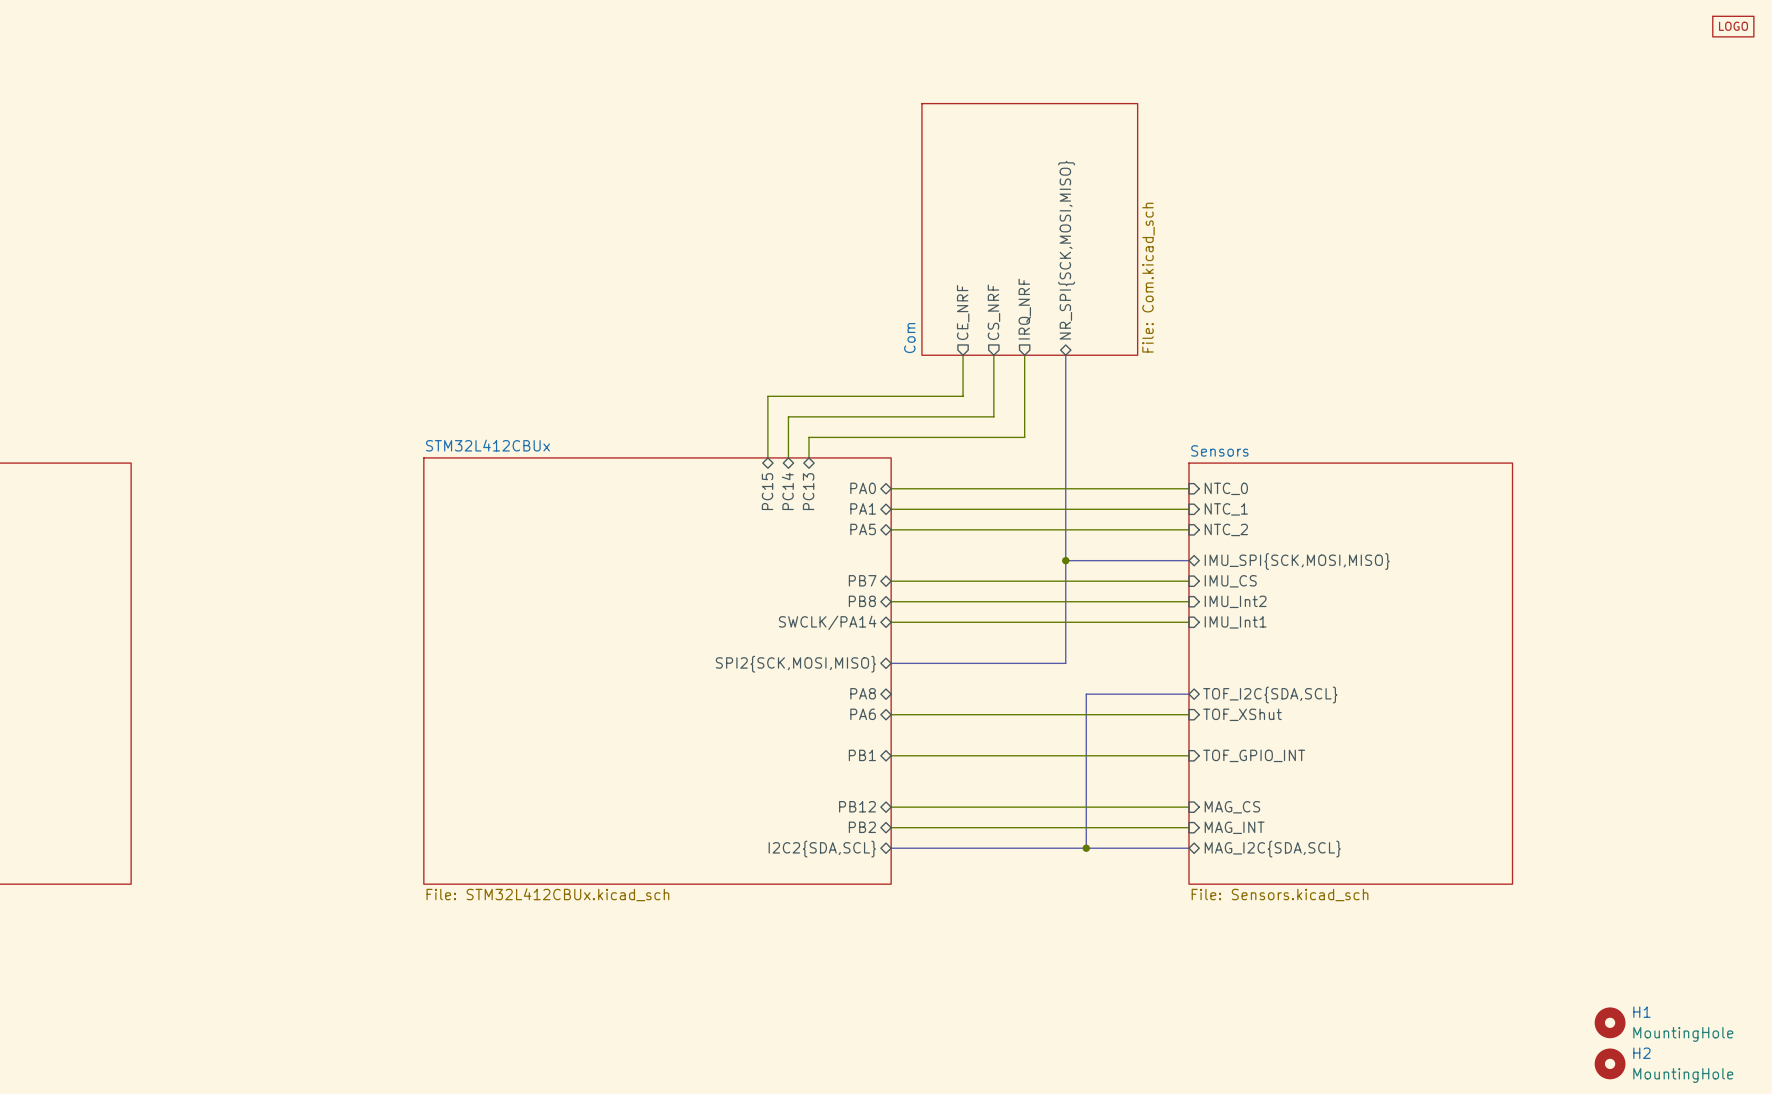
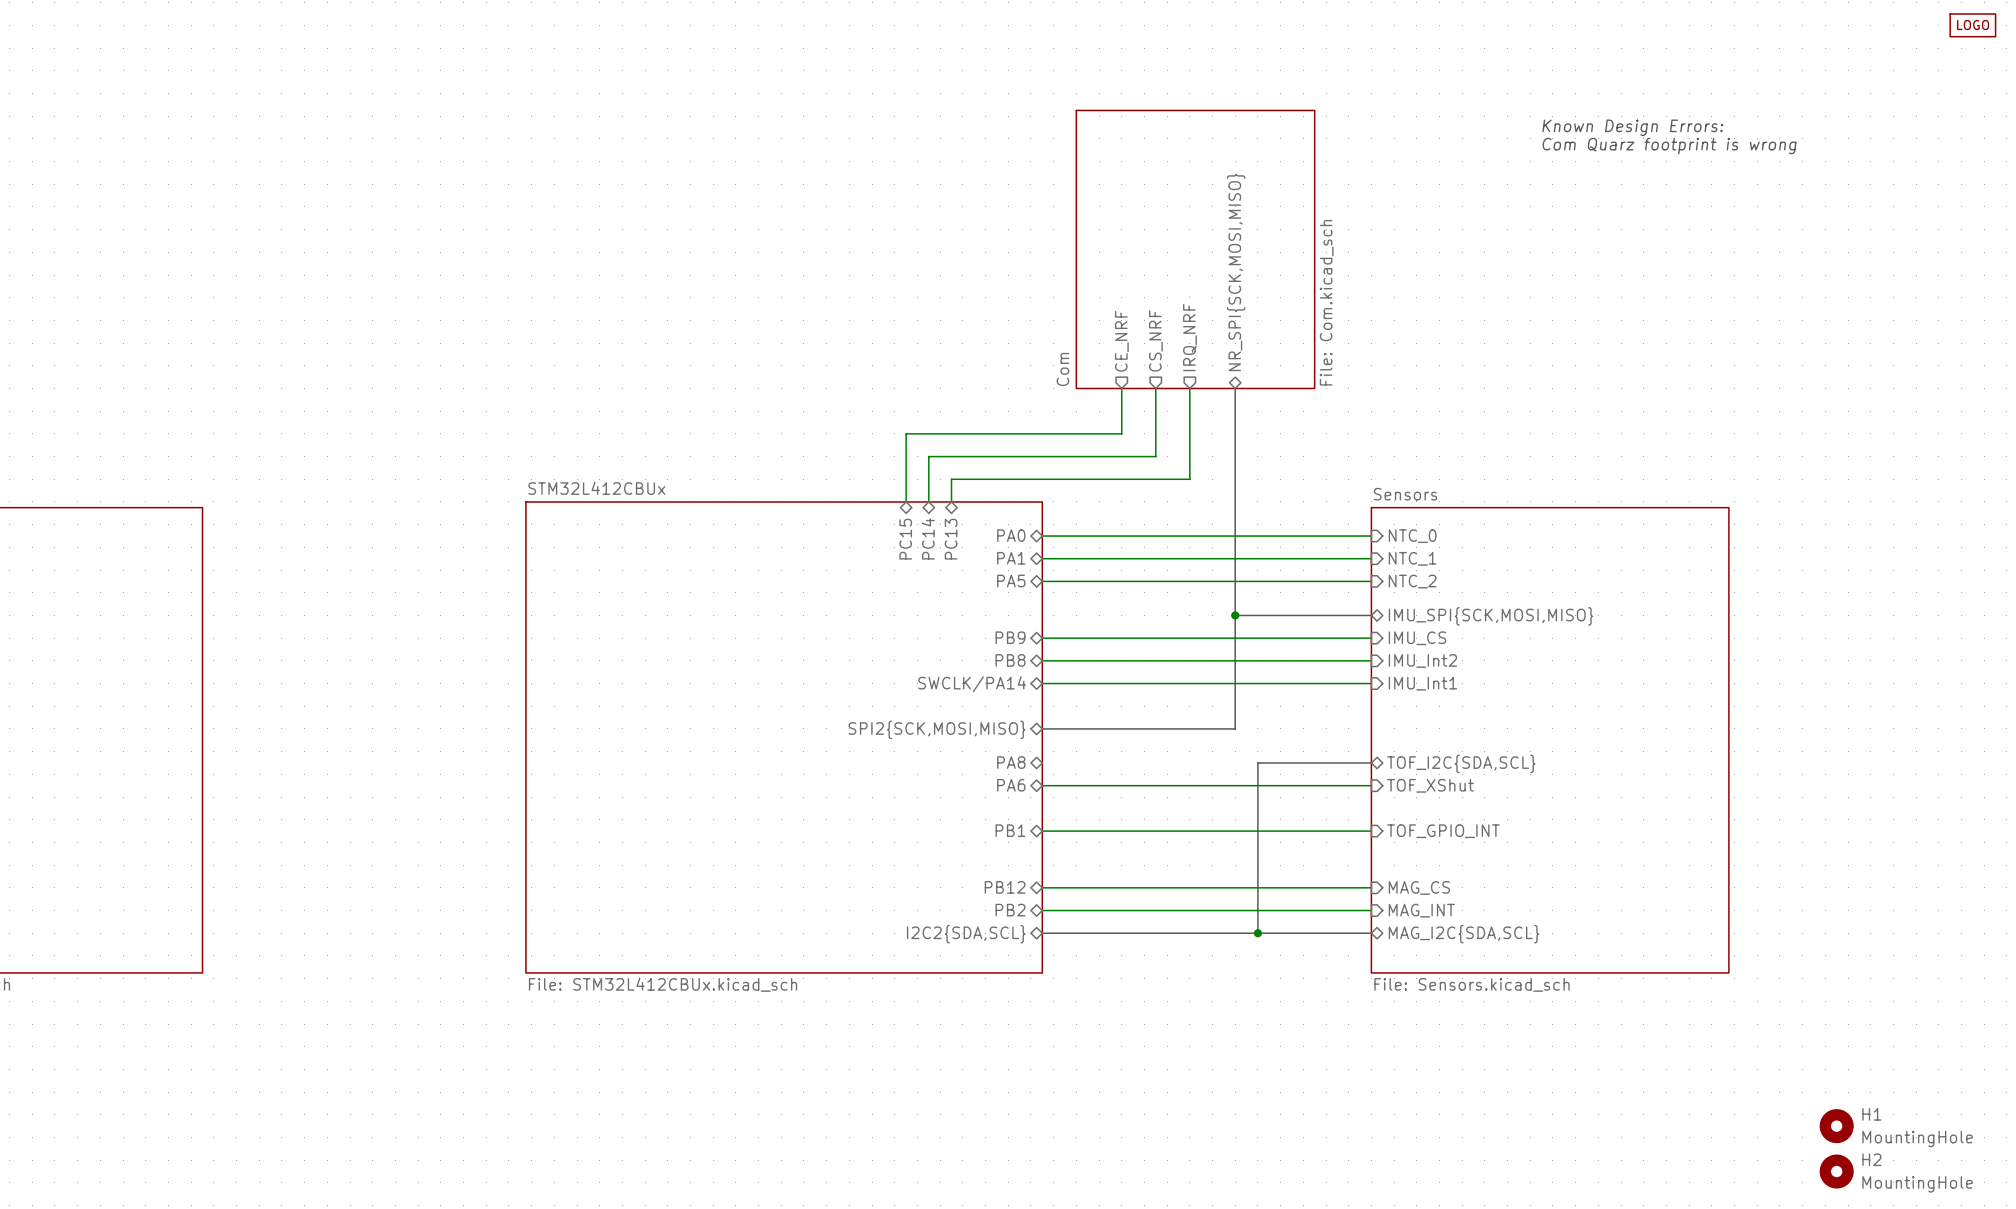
text: none -> Known Design Errors: (1632, 127)
text: none -> Com Quarz footprint is wrong (1669, 146)
sheet pin: PB7 (862, 580) -> PB9 (1010, 637)

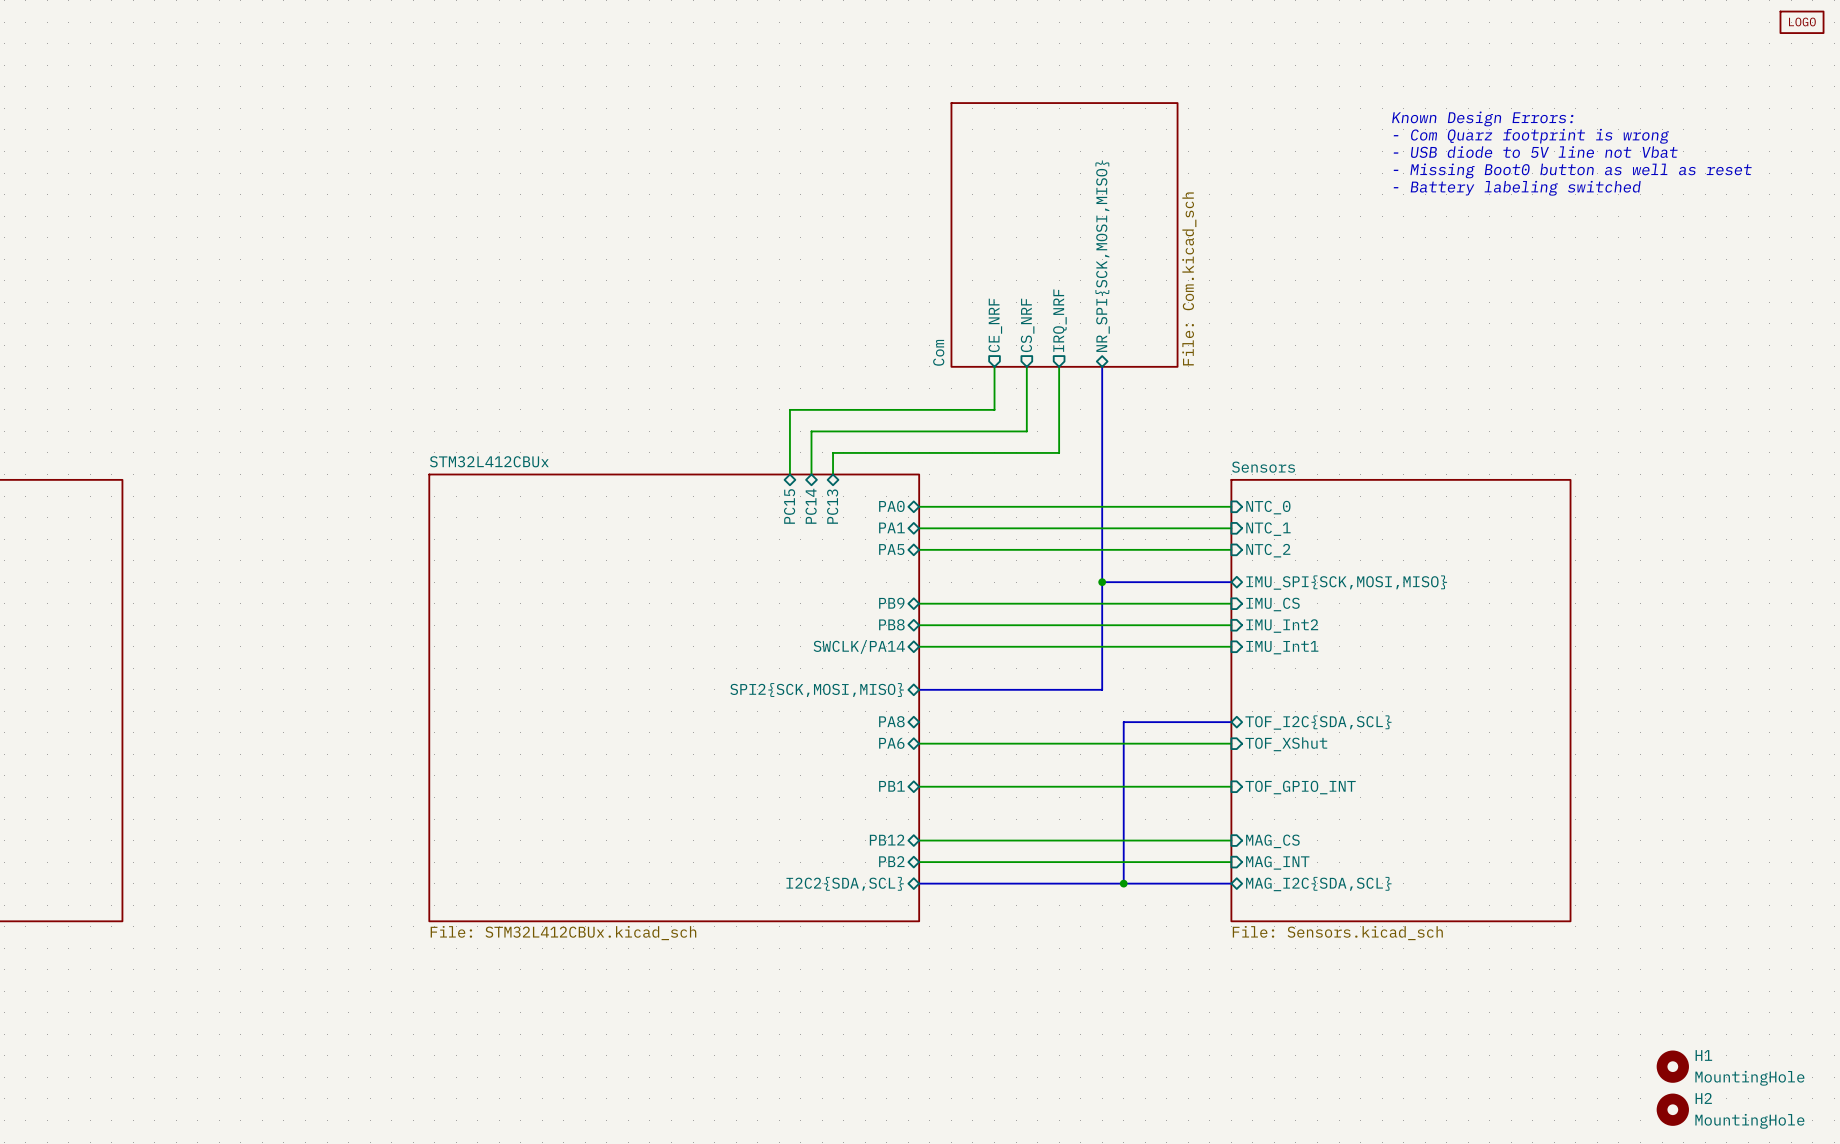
text: Com Quarz footprint is wrong (1669, 146) -> - Com Quarz footprint is wrong (1531, 136)
text: none -> - USB diode to 5V line not Vbat (1535, 152)
text: none -> - Missing Boot0 button as well as reset (1572, 170)
text: none -> - Battery labeling switched (1517, 188)

